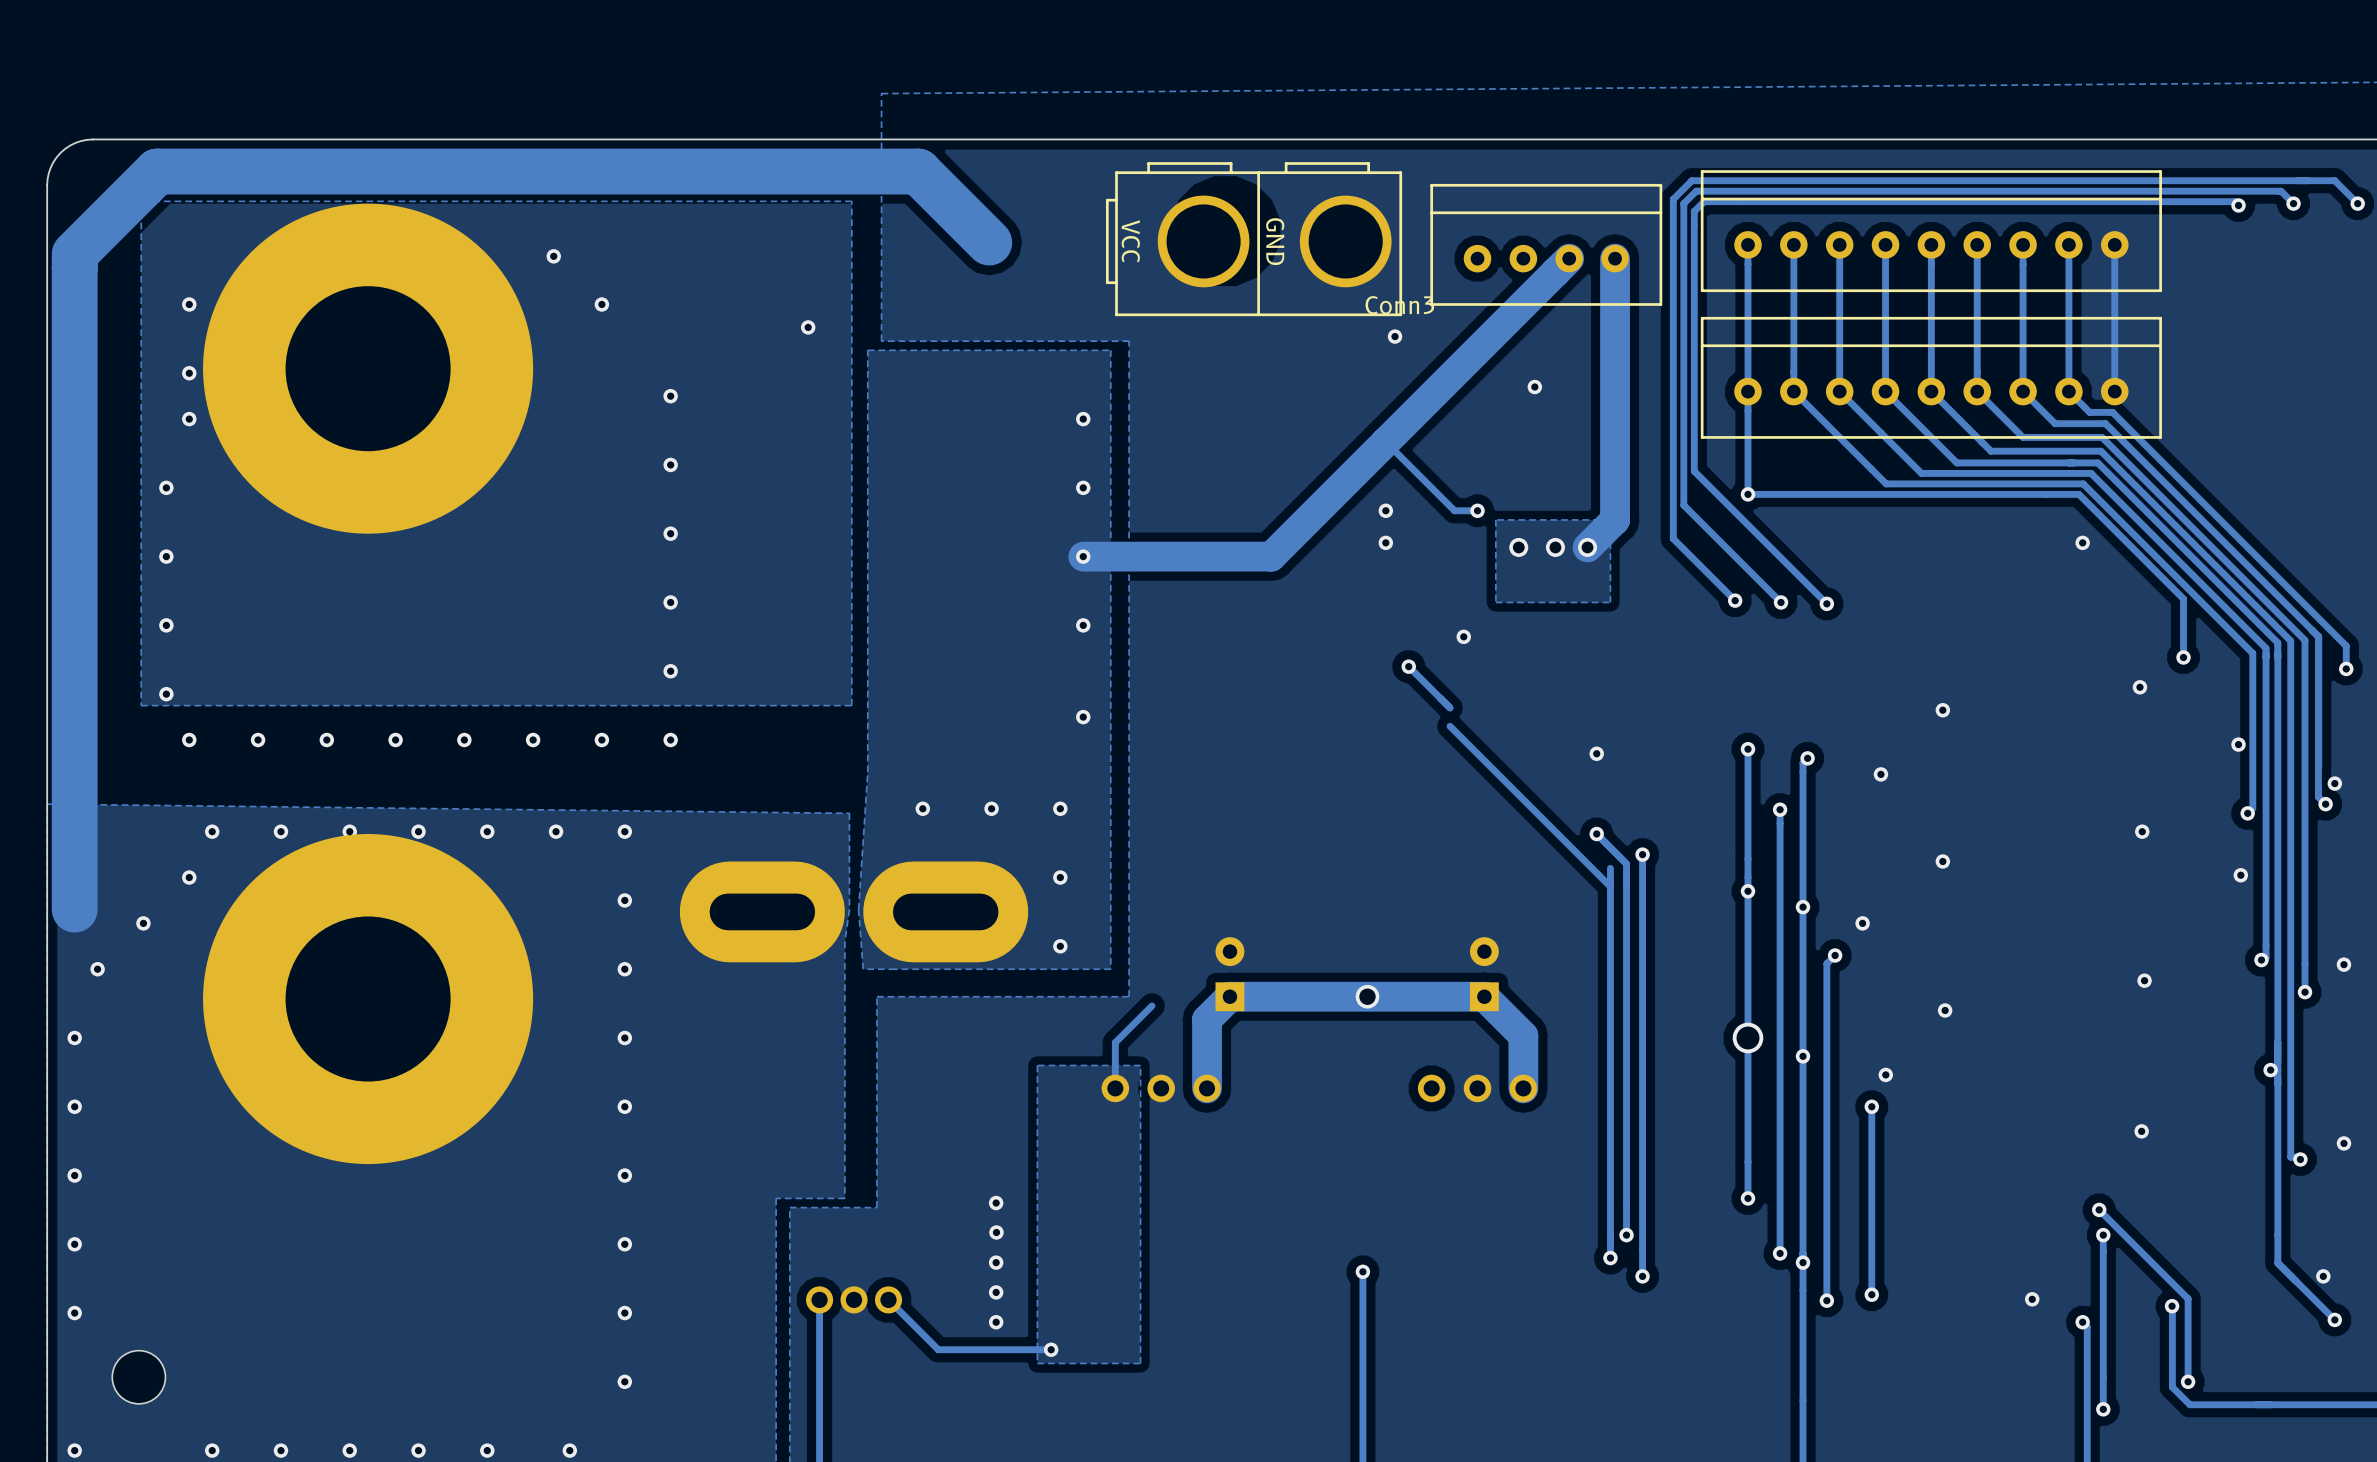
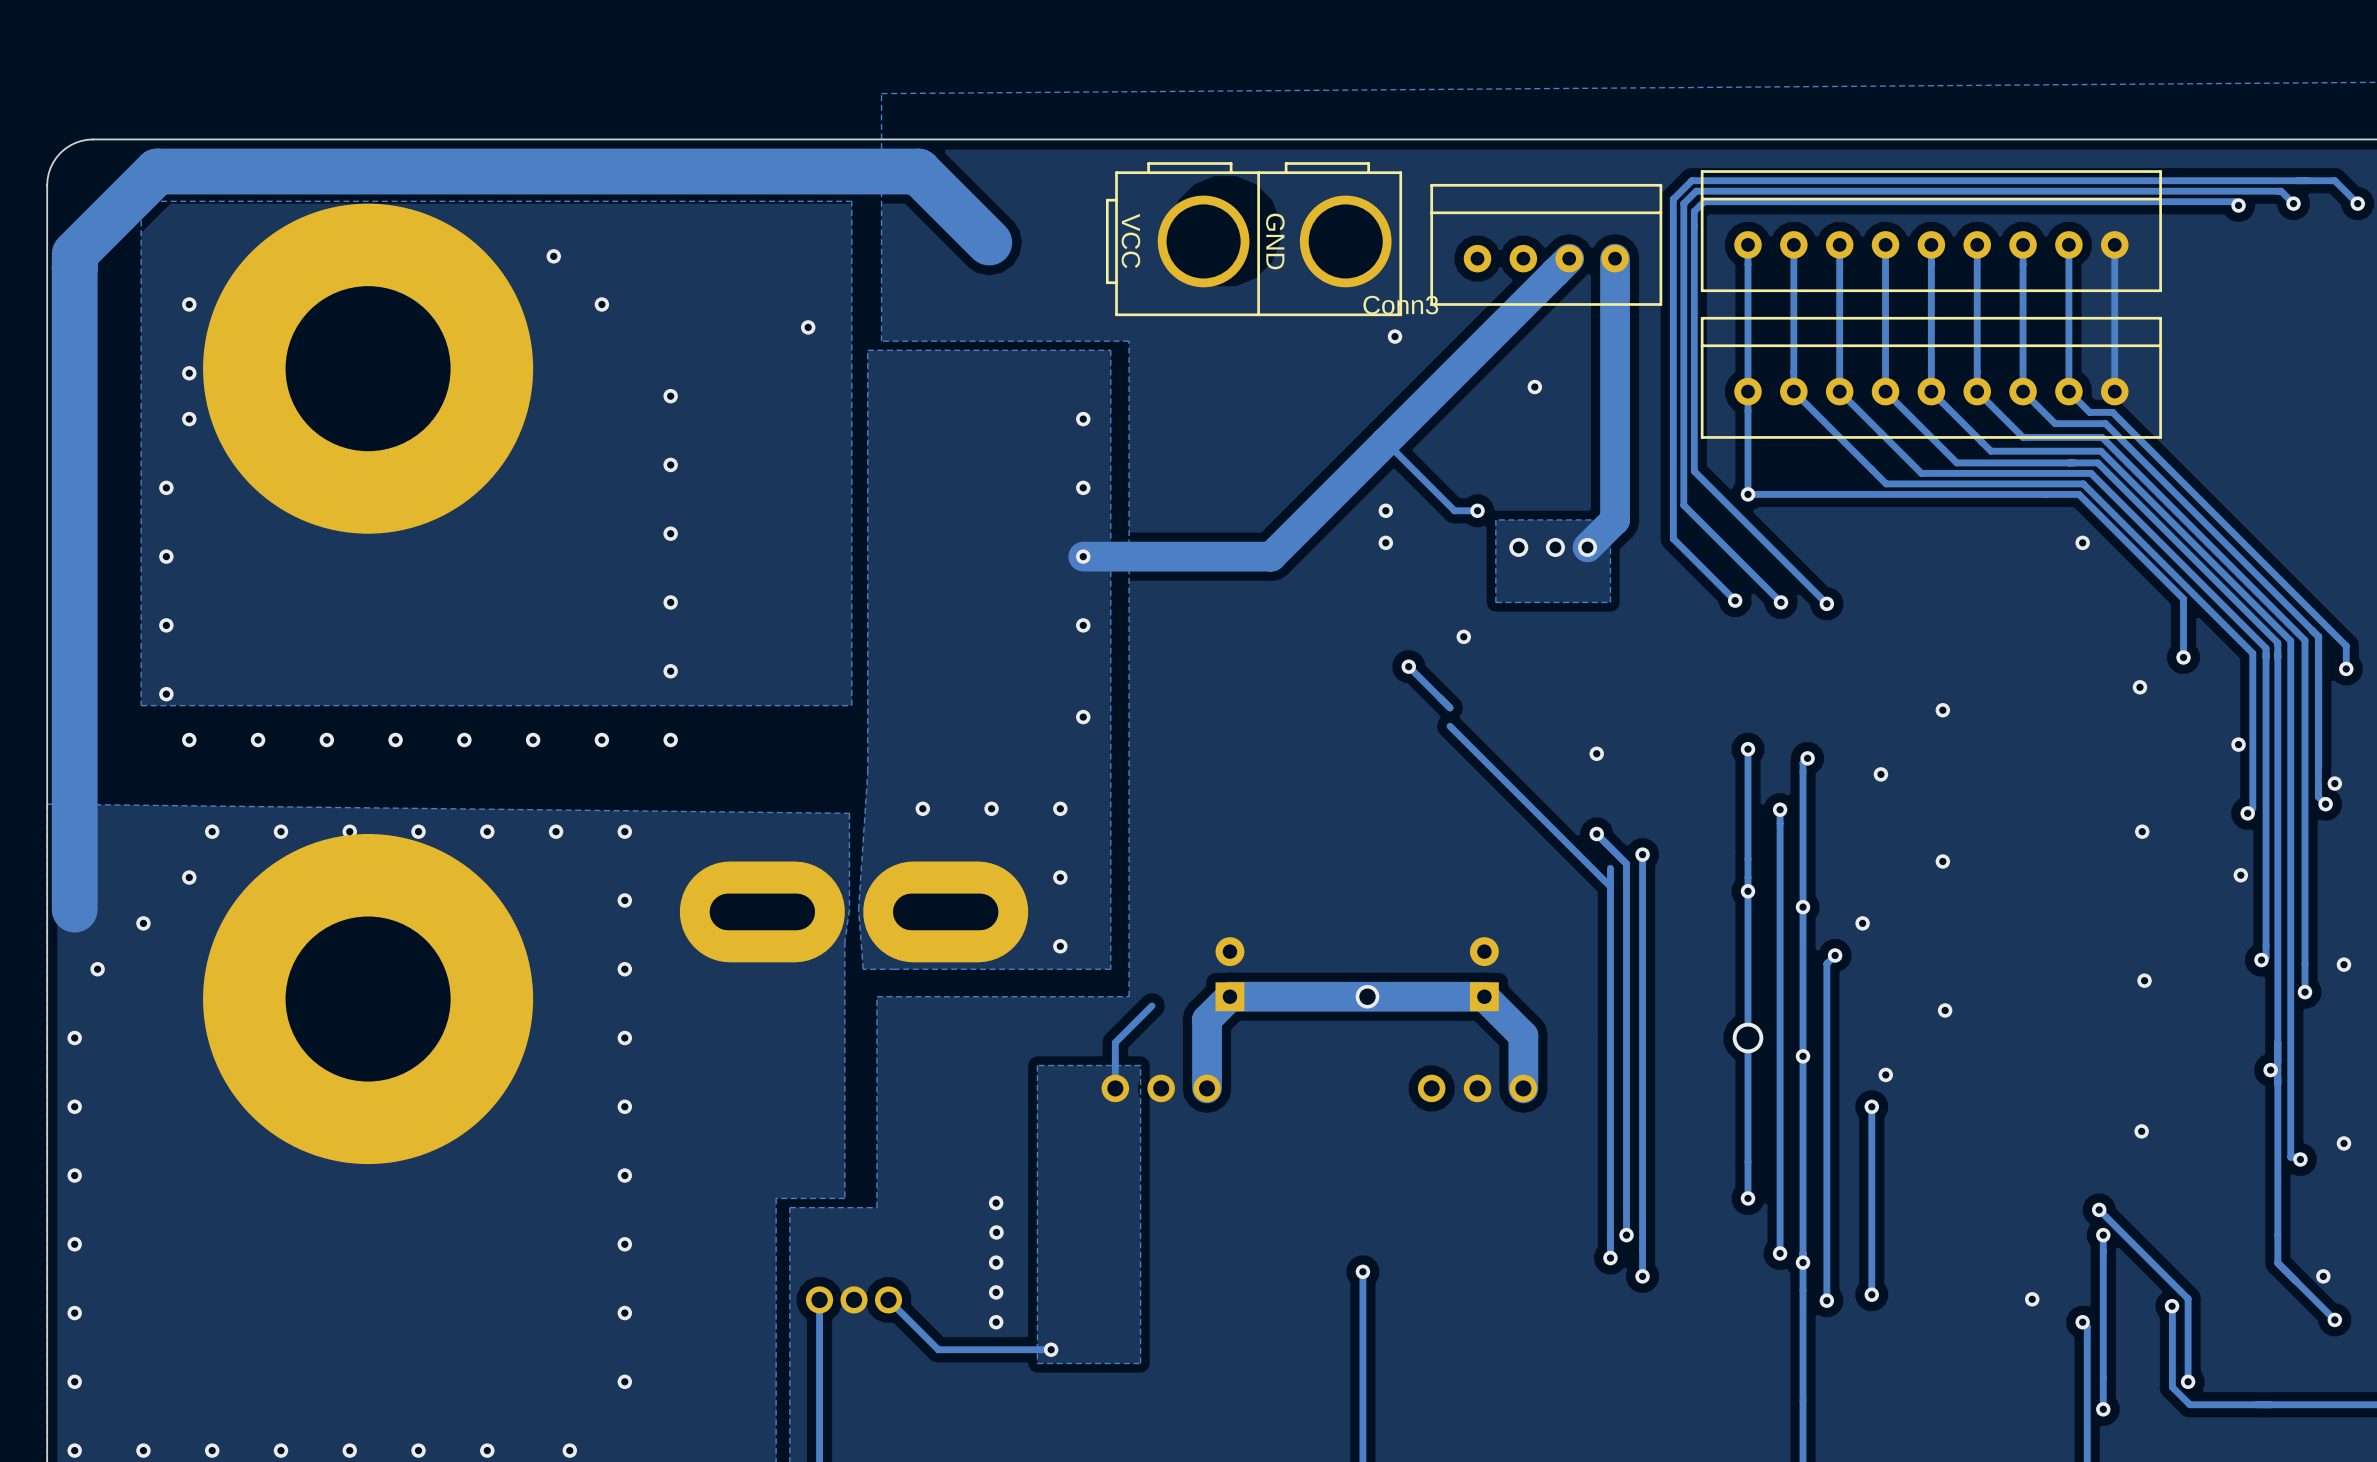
part: (138, 1377) -> none
via: none -> (74, 1381)
via: none -> (143, 1450)

